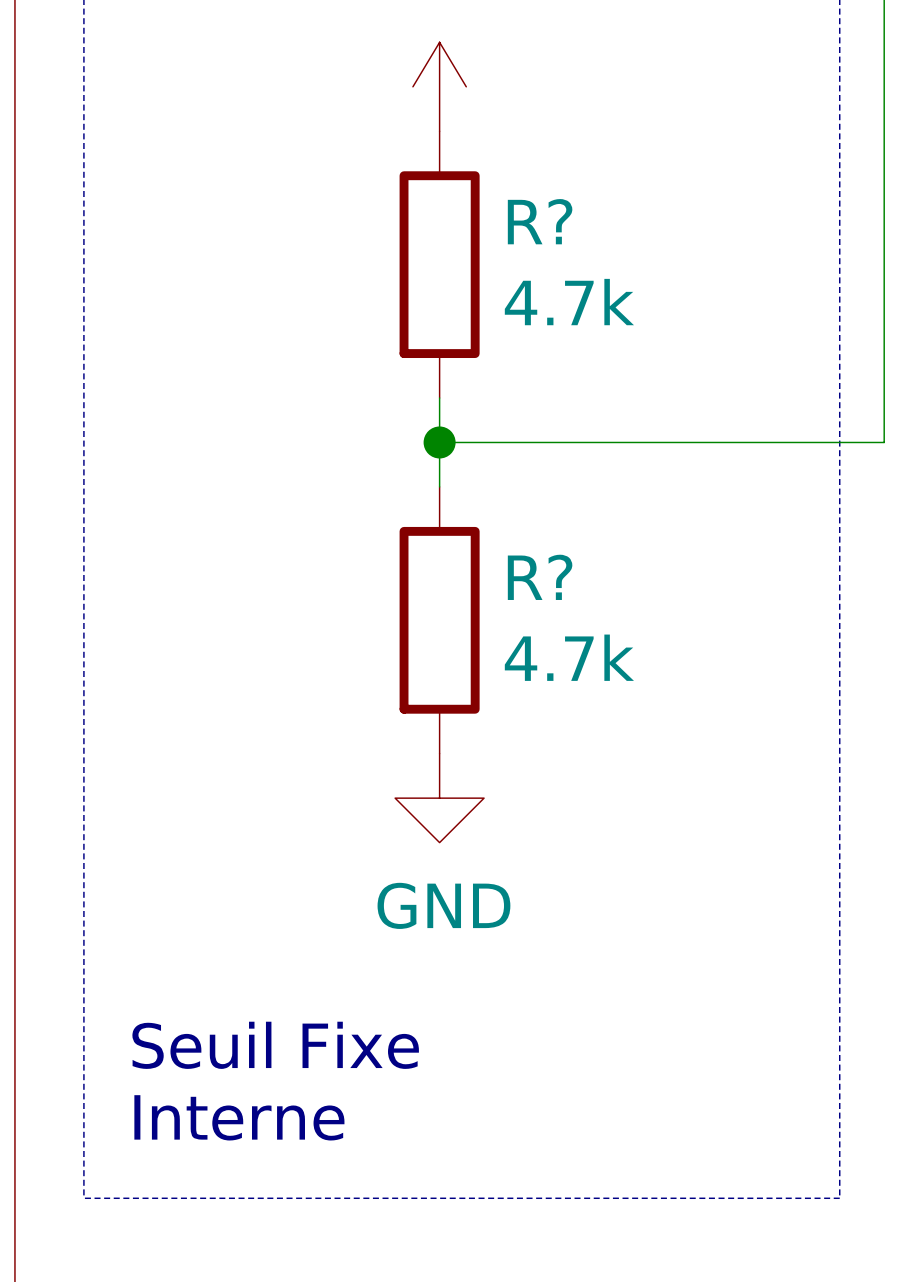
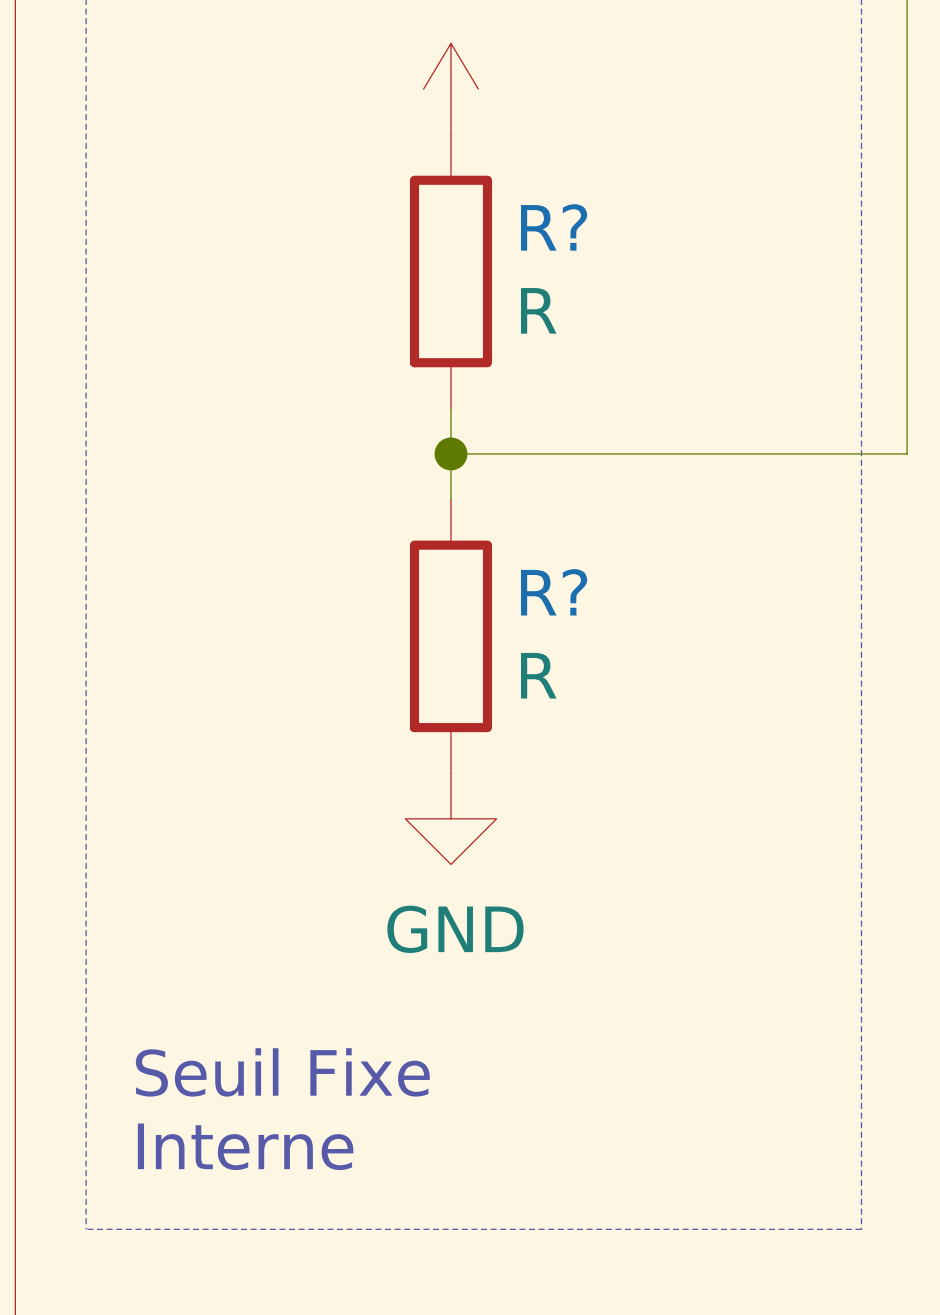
R? value: 4.7k (569, 302) -> R (538, 310)
R? value: 4.7k (569, 657) -> R (538, 675)

